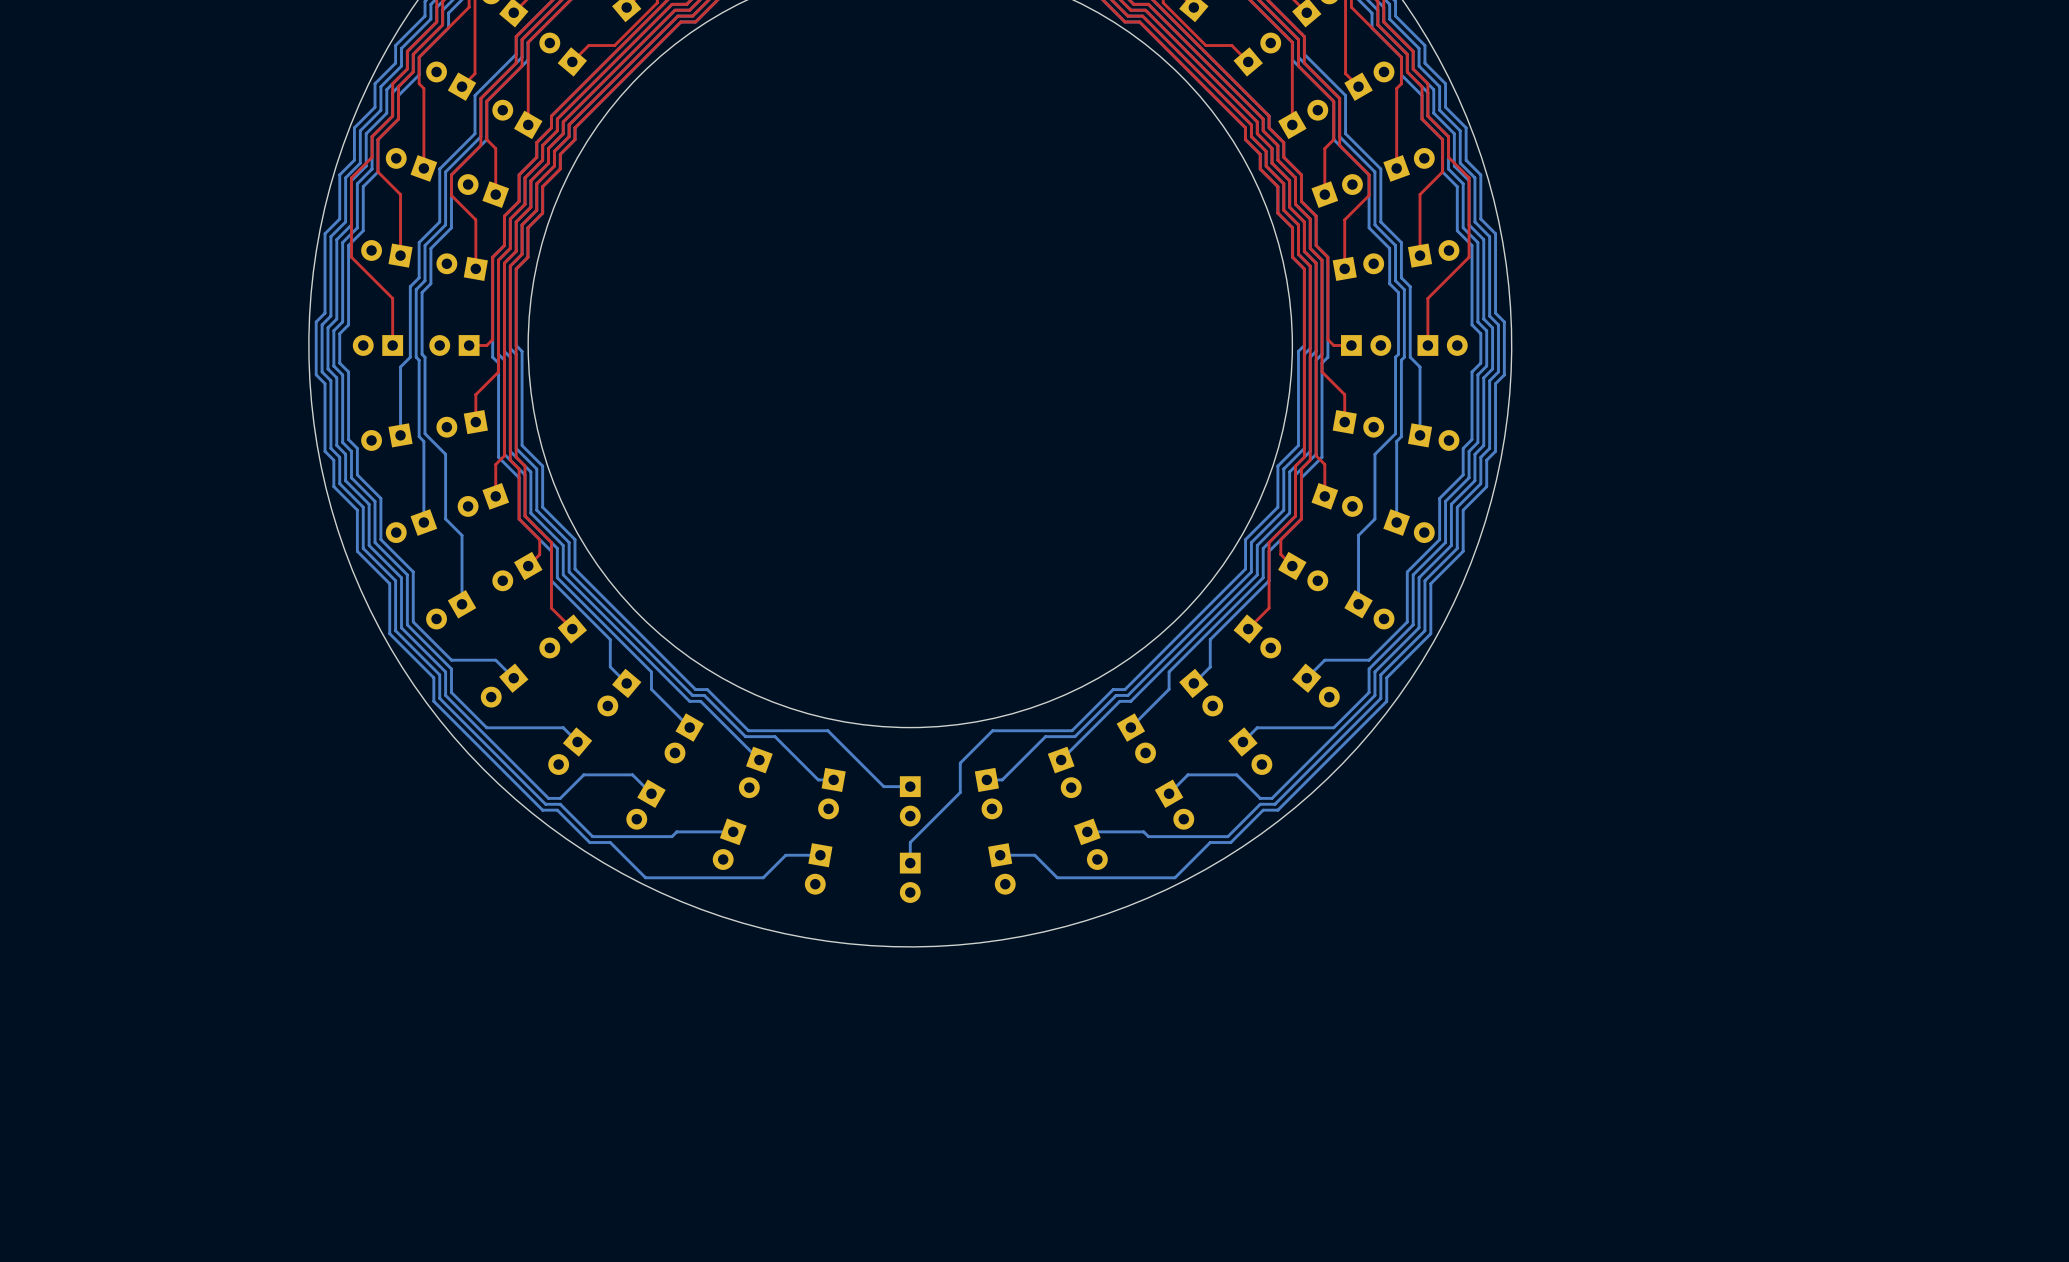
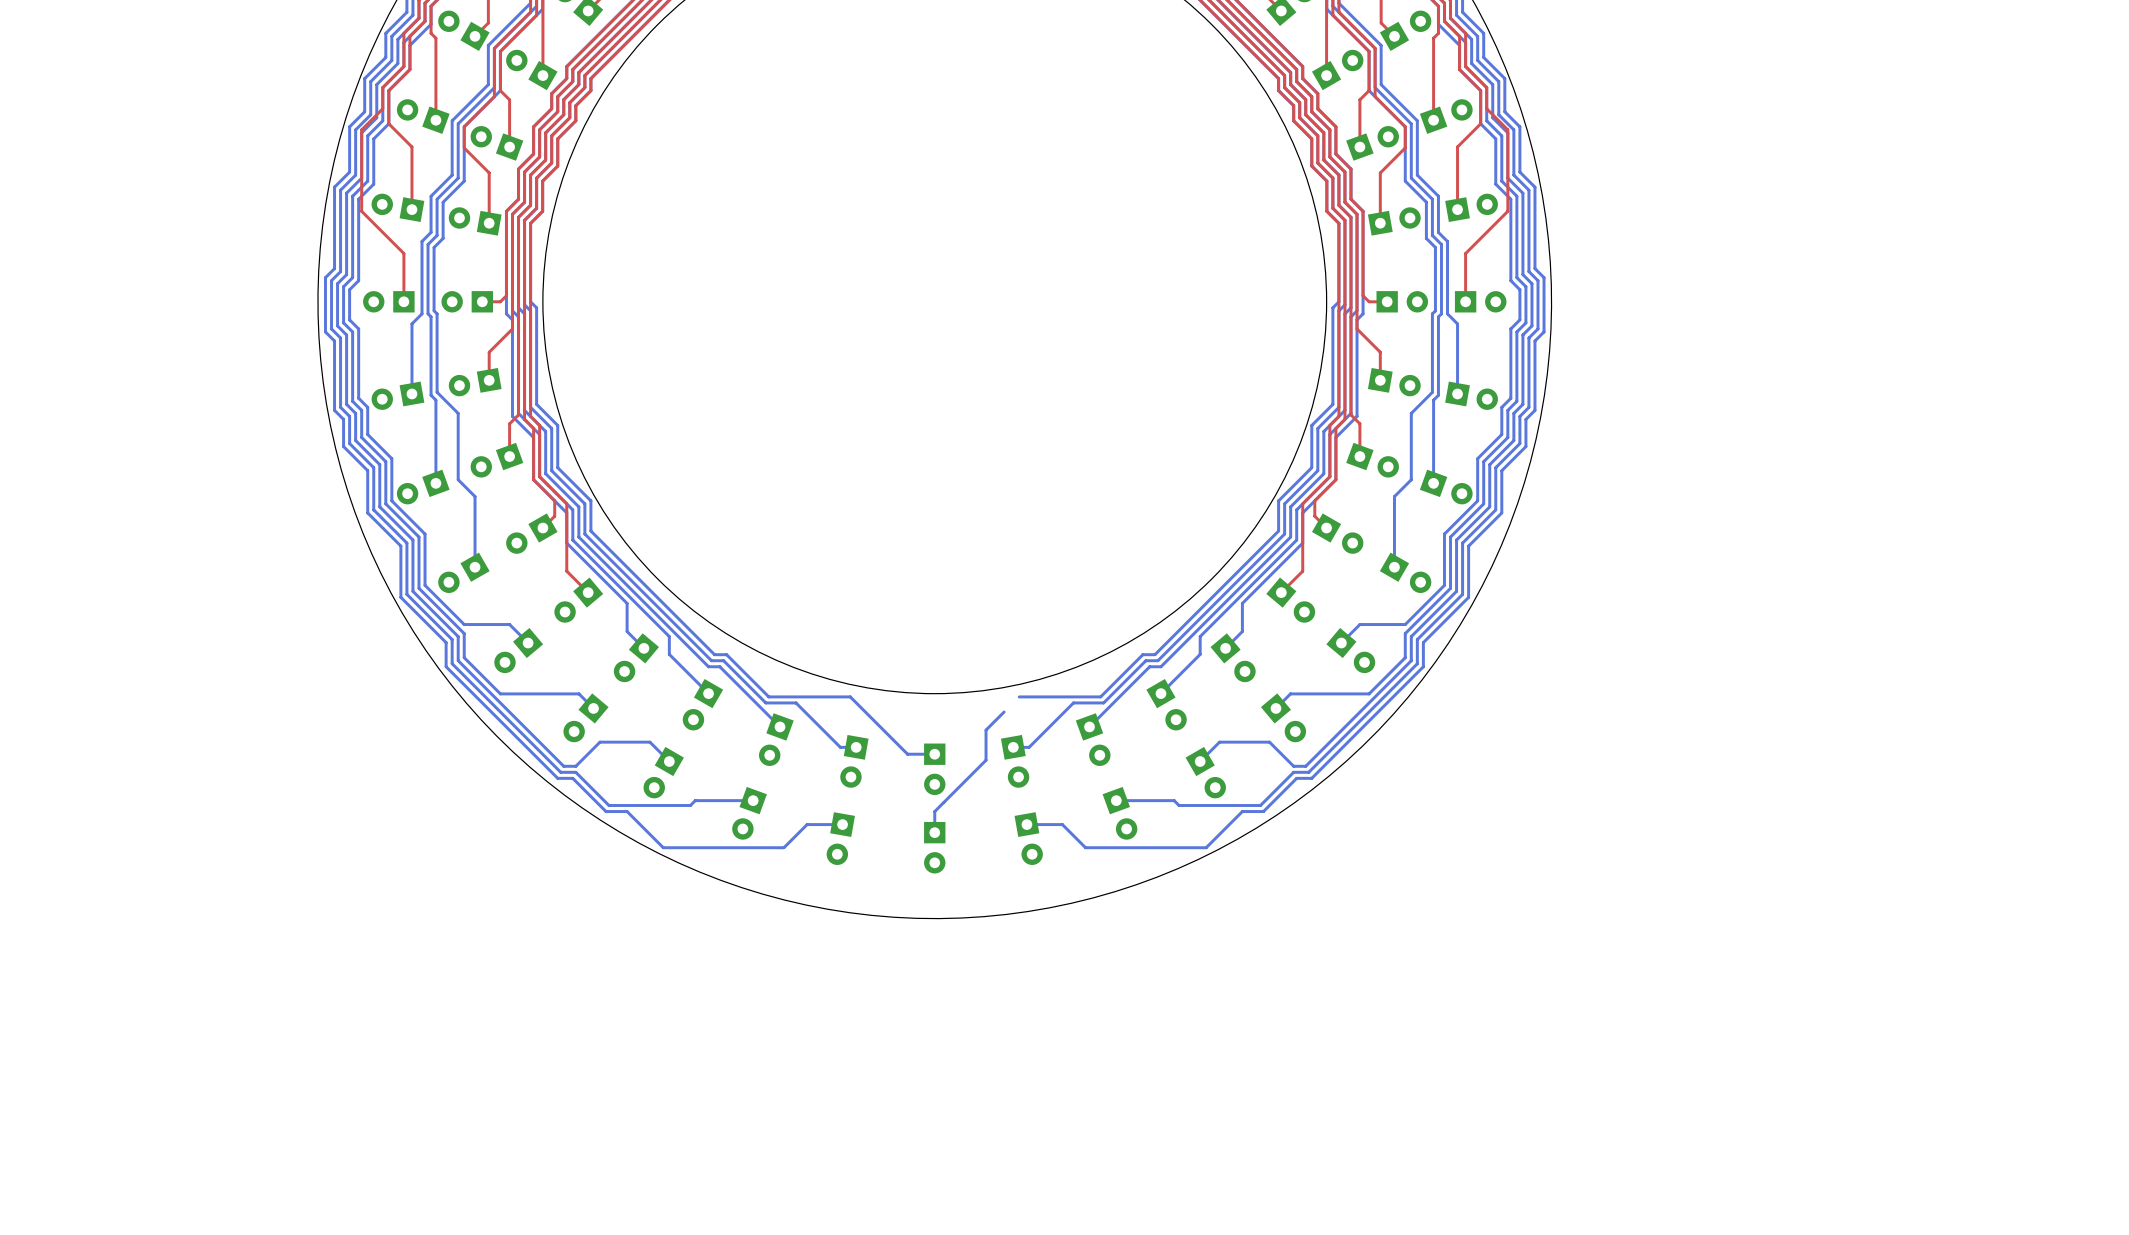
bottom track: (992, 730) (977, 745) -> none

